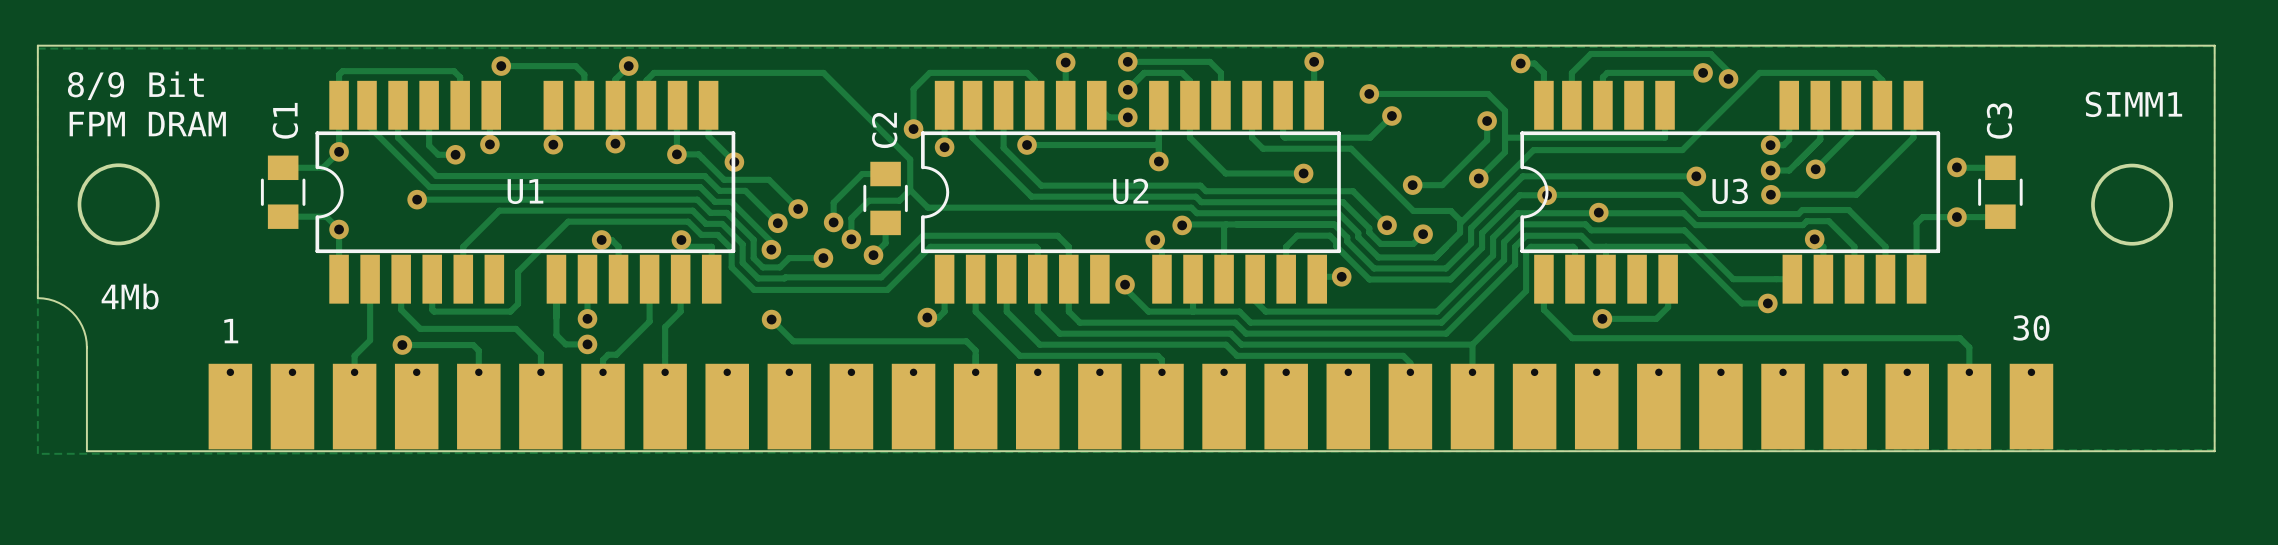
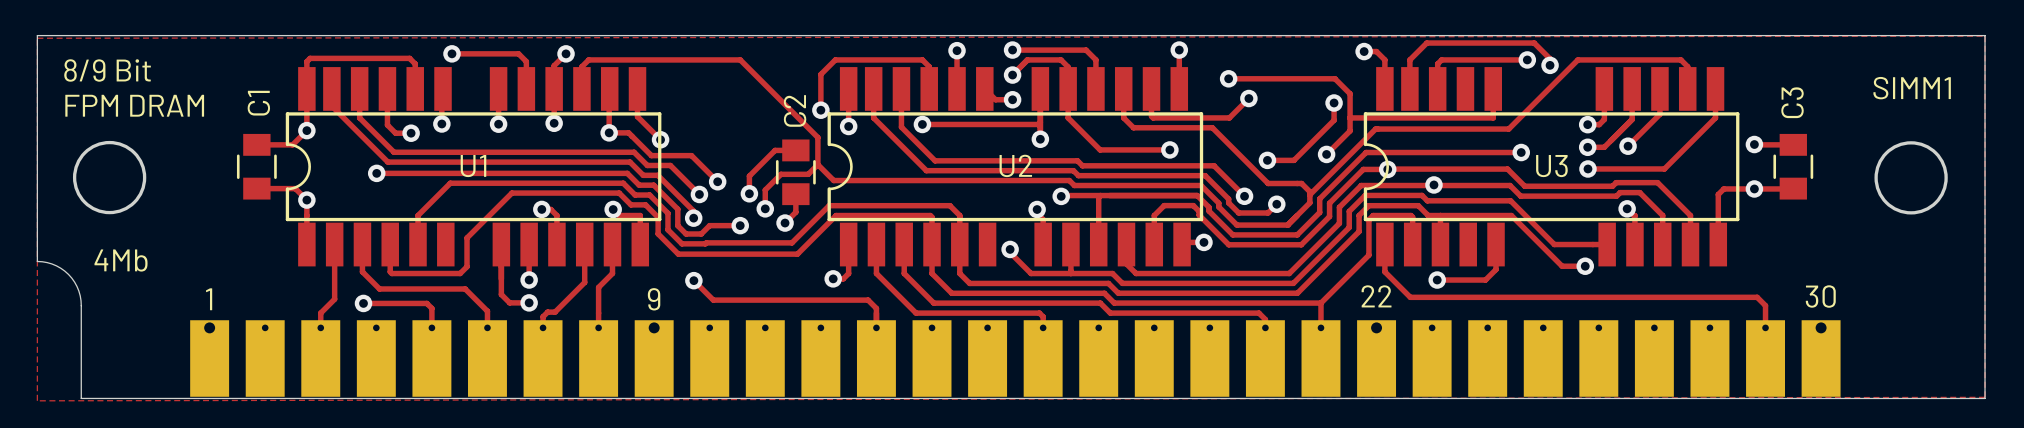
text: none -> 22 (1376, 296)
text: none -> 9 (654, 299)
SIMM1 footprint: [208, 363, 2054, 450] -> [190, 320, 1841, 397]

